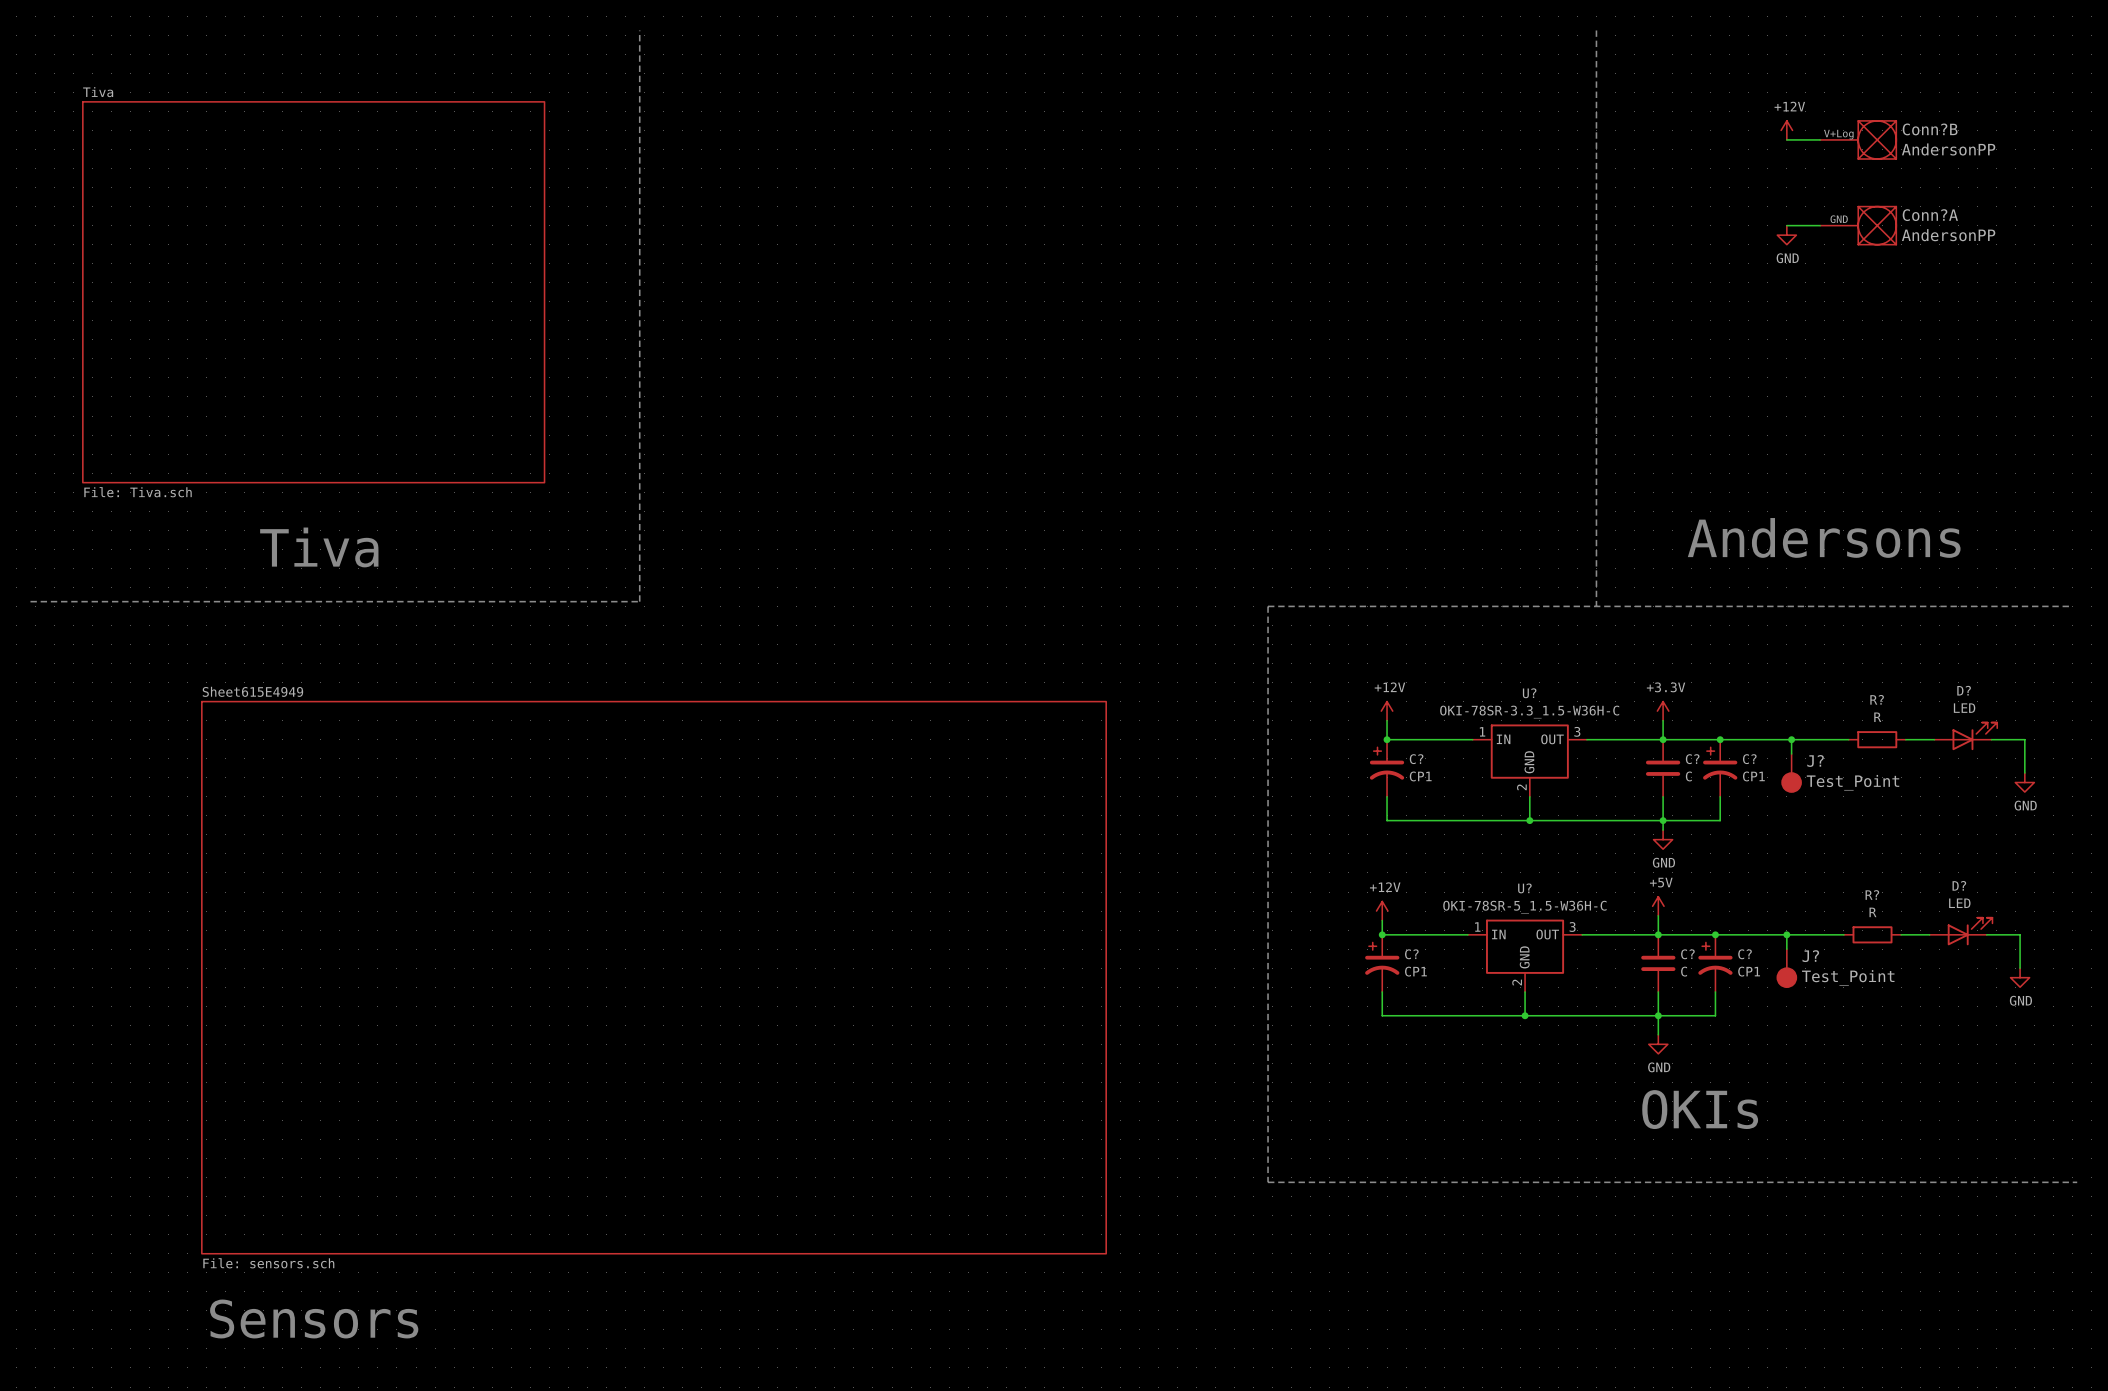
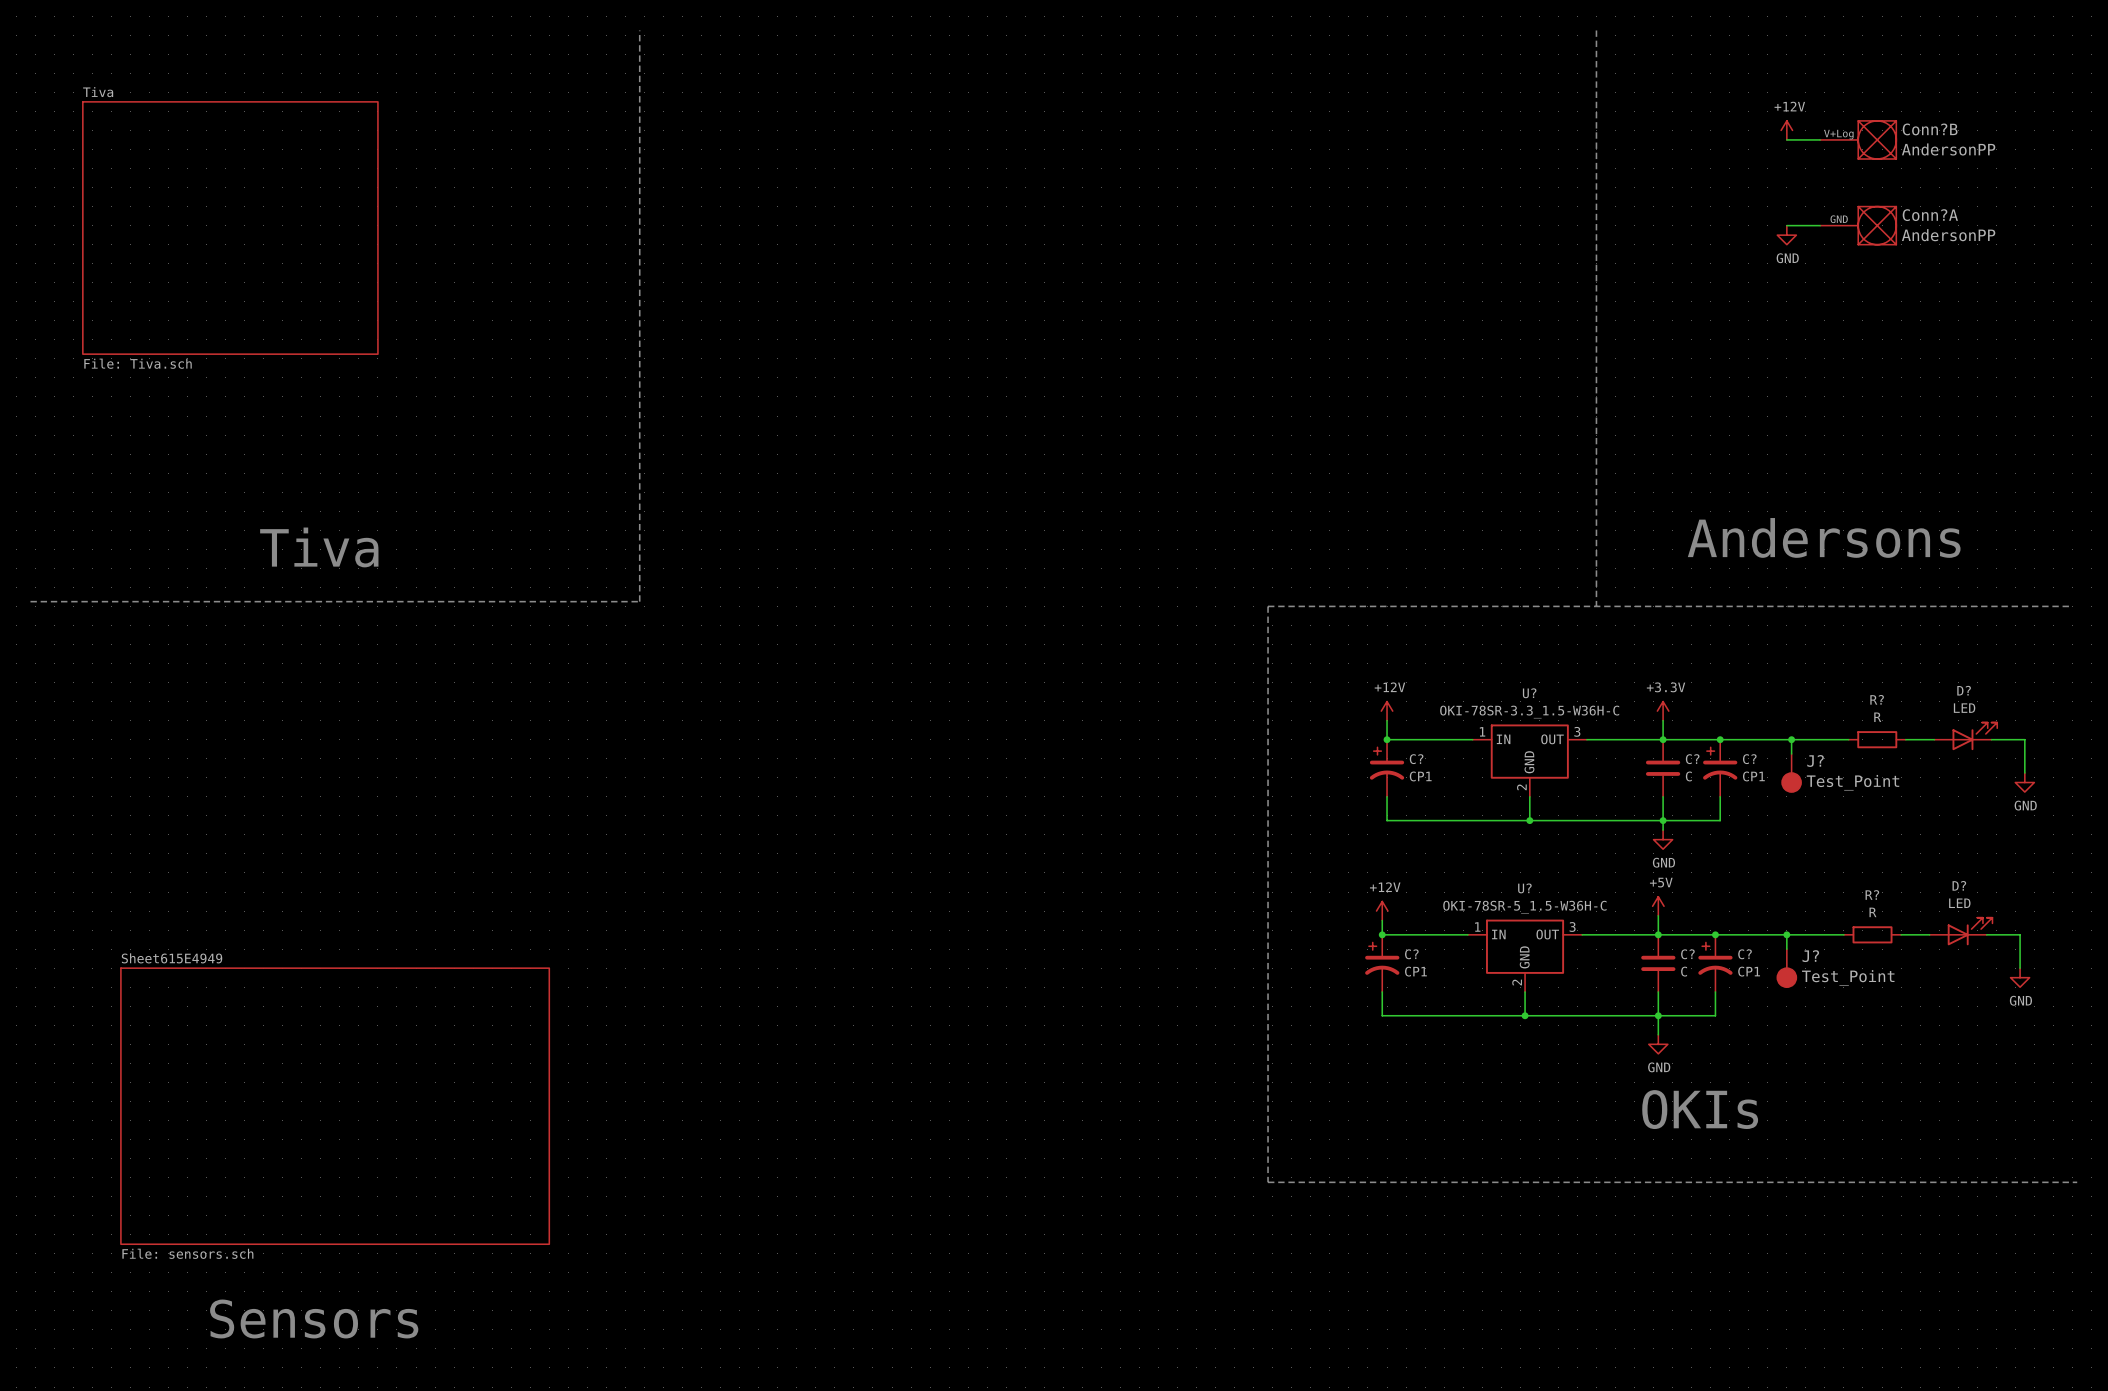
sheet Tiva: none -> File: Tiva.sch (230, 228)
sheet Tiva: File: Tiva.sch (313, 292) -> none
sheet Sheet615E4949 name position: Sheet615E4949 (252, 691) -> Sheet615E4949 (172, 958)
sheet Sheet615E4949 shape: [201, 701, 1107, 1254] -> [120, 968, 550, 1245]
sheet Sheet615E4949 value position: File: sensors.sch (268, 1263) -> File: sensors.sch (187, 1253)

